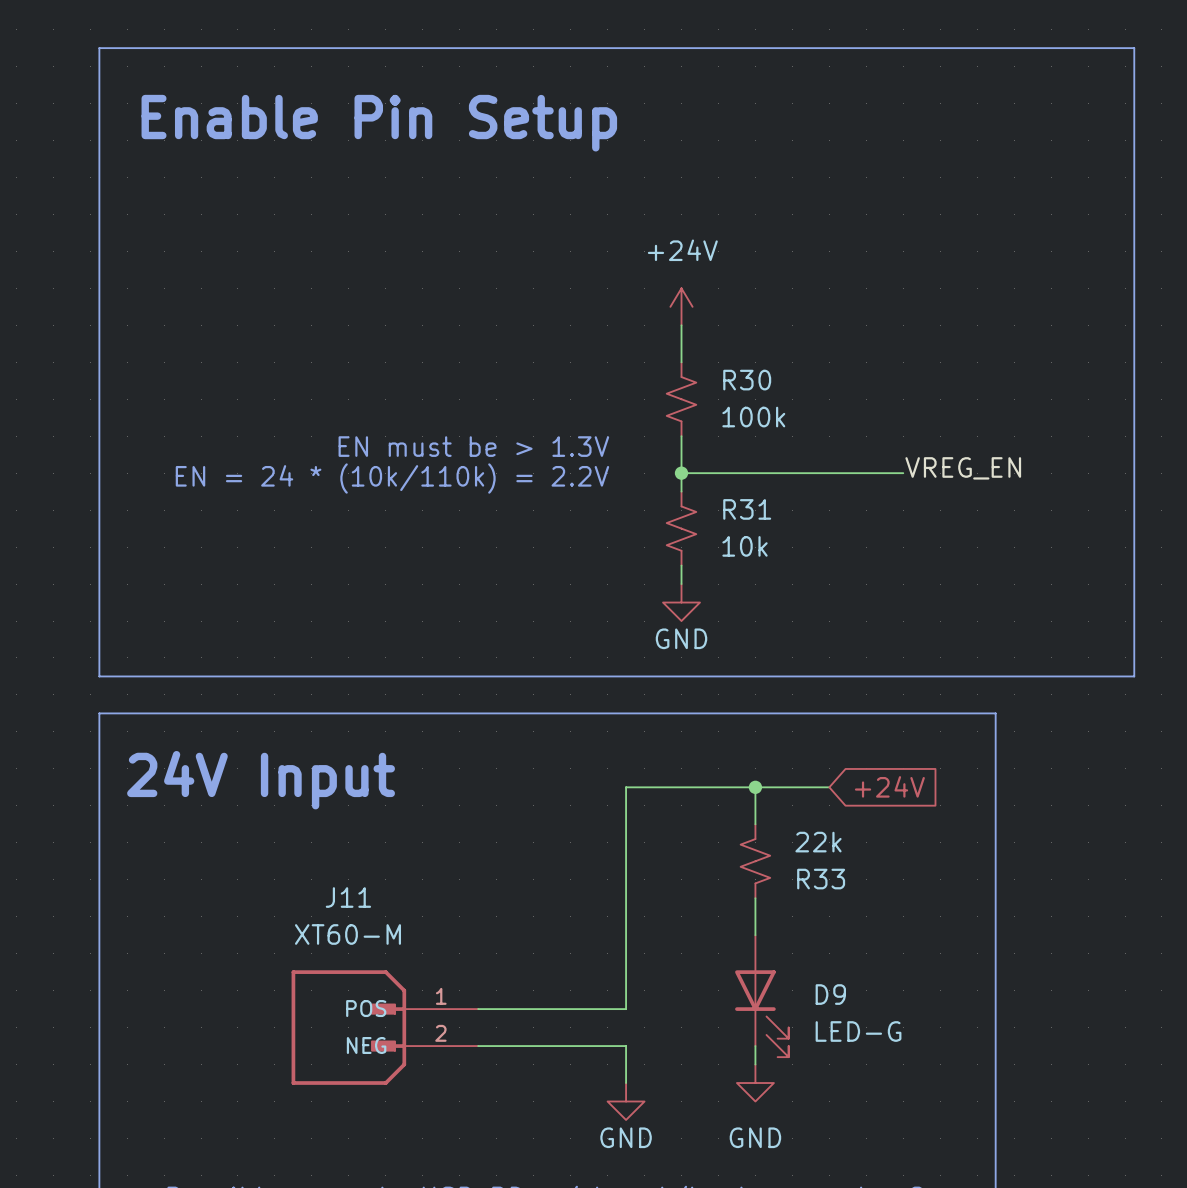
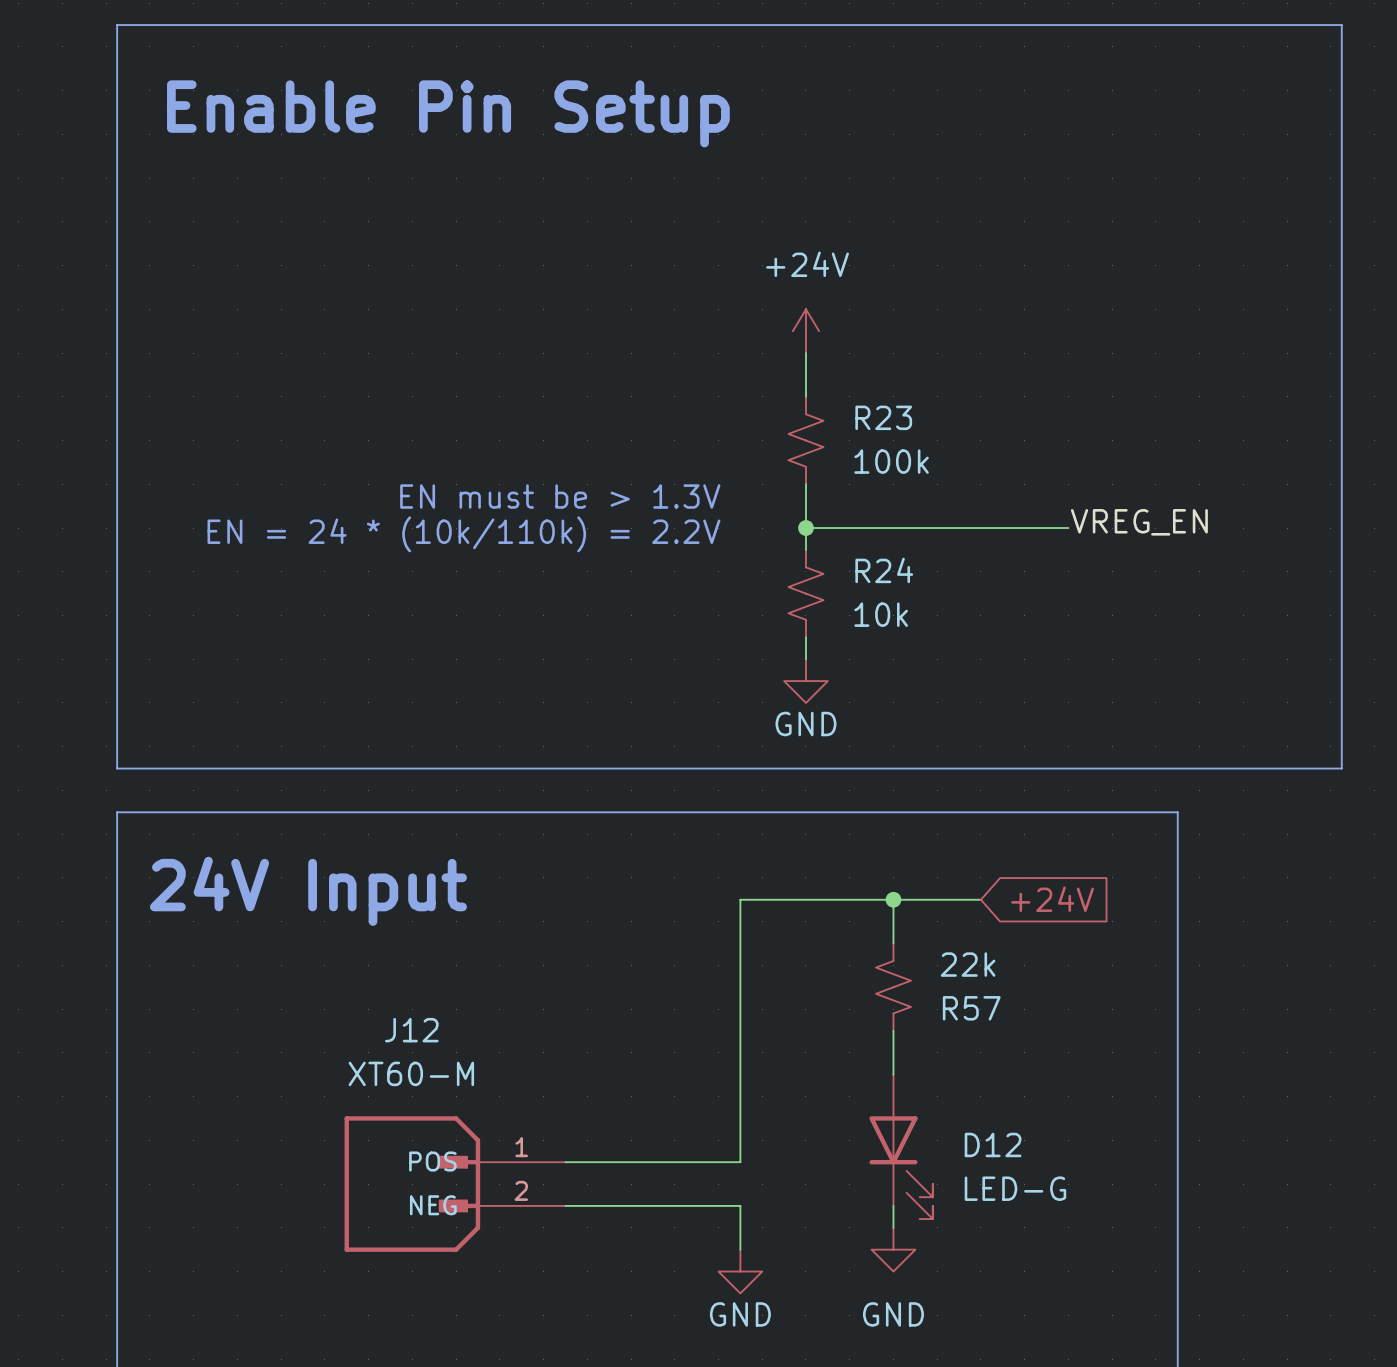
R30 name: R30 (747, 380) -> R23 (883, 417)
R31 name: R31 (747, 509) -> R24 (884, 570)
R33 name: R33 (821, 879) -> R57 (971, 1008)
J11 name: J11 (348, 897) -> J12 (411, 1030)
D9 name: D9 (830, 994) -> D12 (993, 1144)

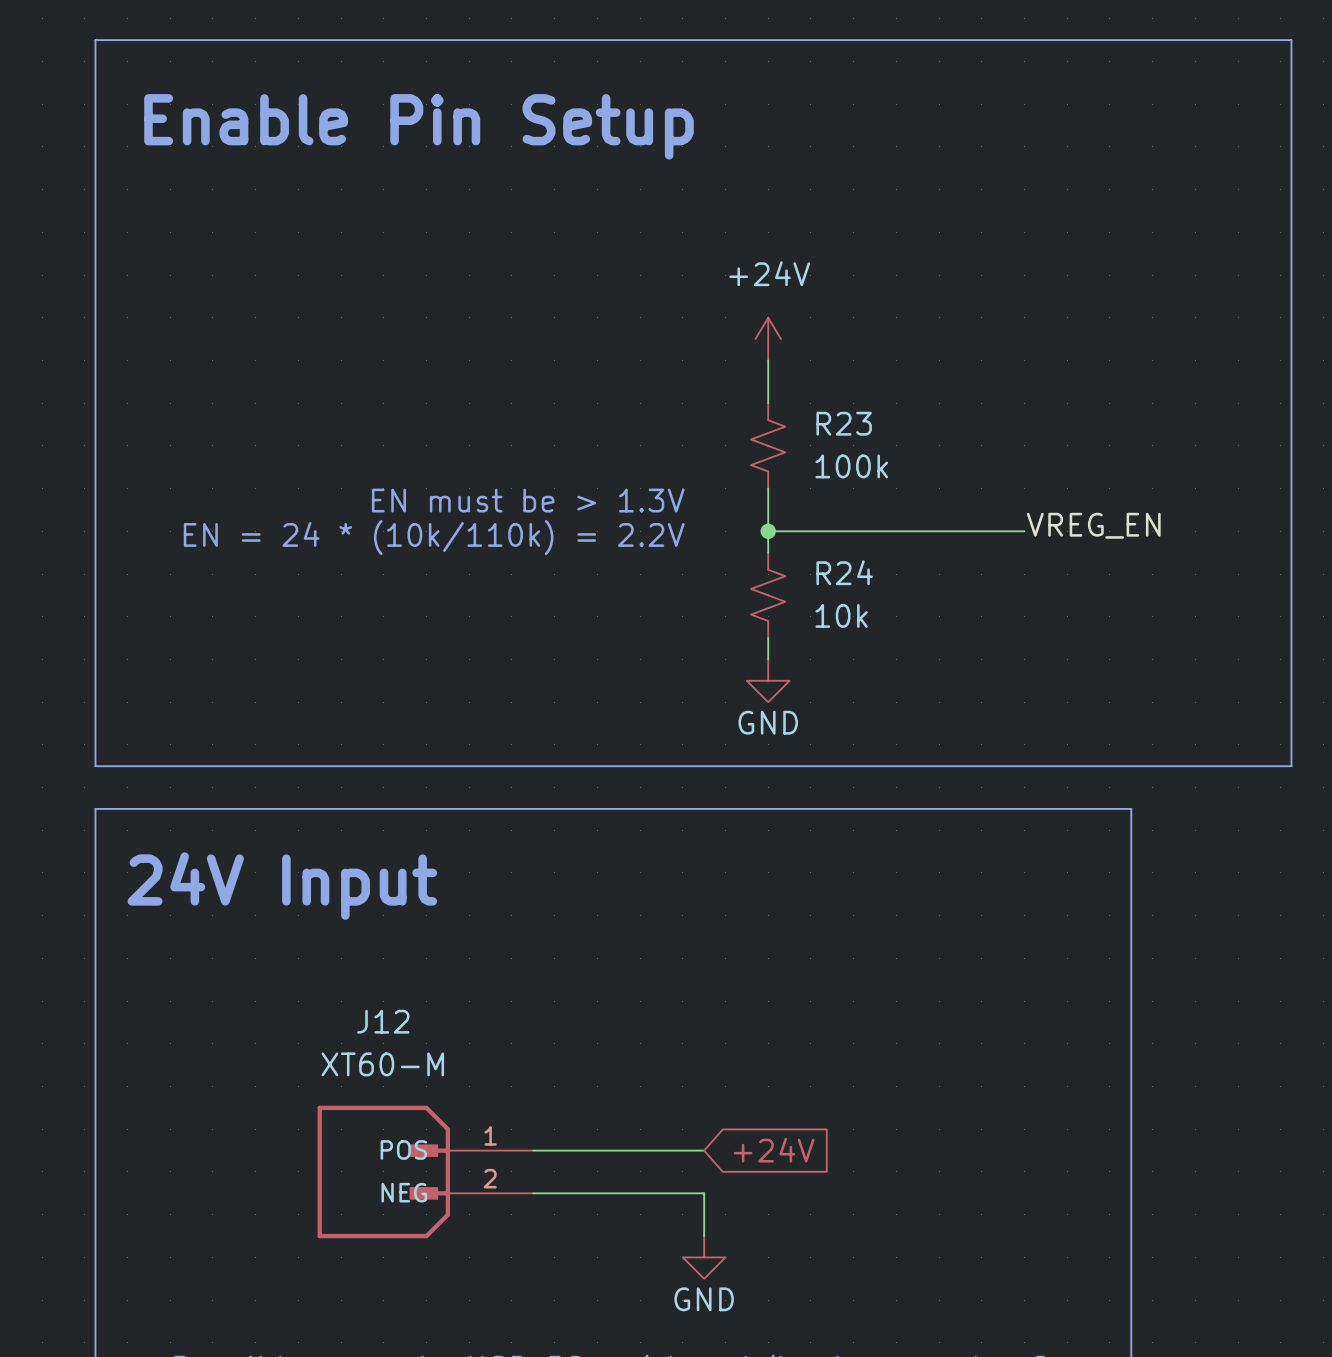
wire: (893, 899) (893, 943) -> none
junction: (893, 899) -> none
wire: (980, 899) (740, 899) (740, 1162) -> none
global label position: +24V (1052, 899) -> +24V (774, 1150)
R57: 22k (893, 987) -> none
wire: (893, 1030) (893, 1074) -> none
D12: LED-G (901, 1146) -> none
wire: (893, 1205) (893, 1227) -> none
power symbol: GND (893, 1249) -> none

